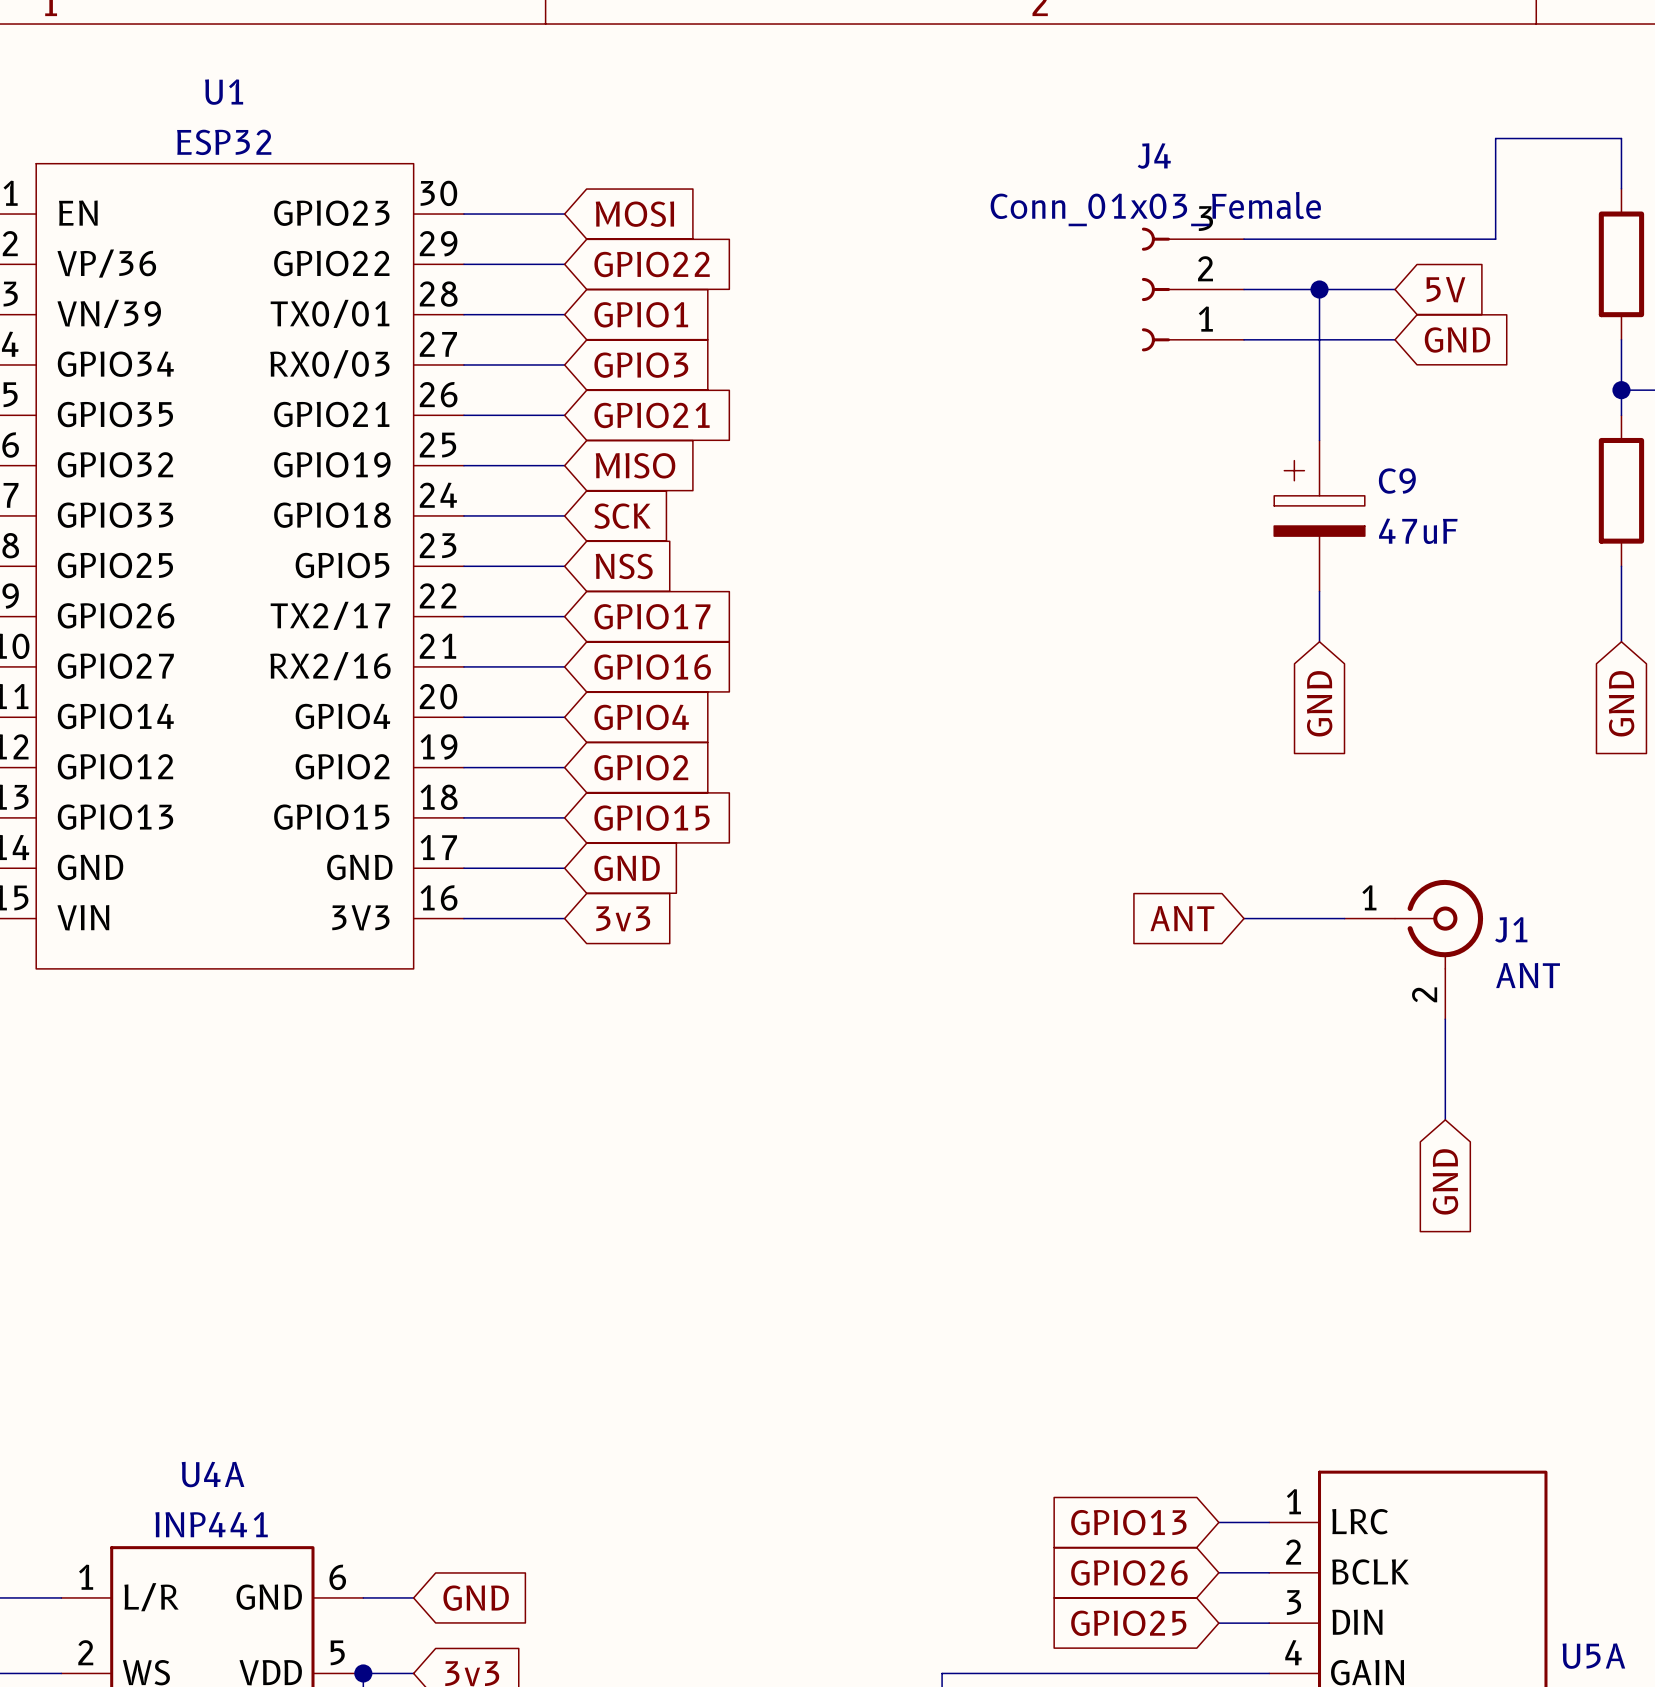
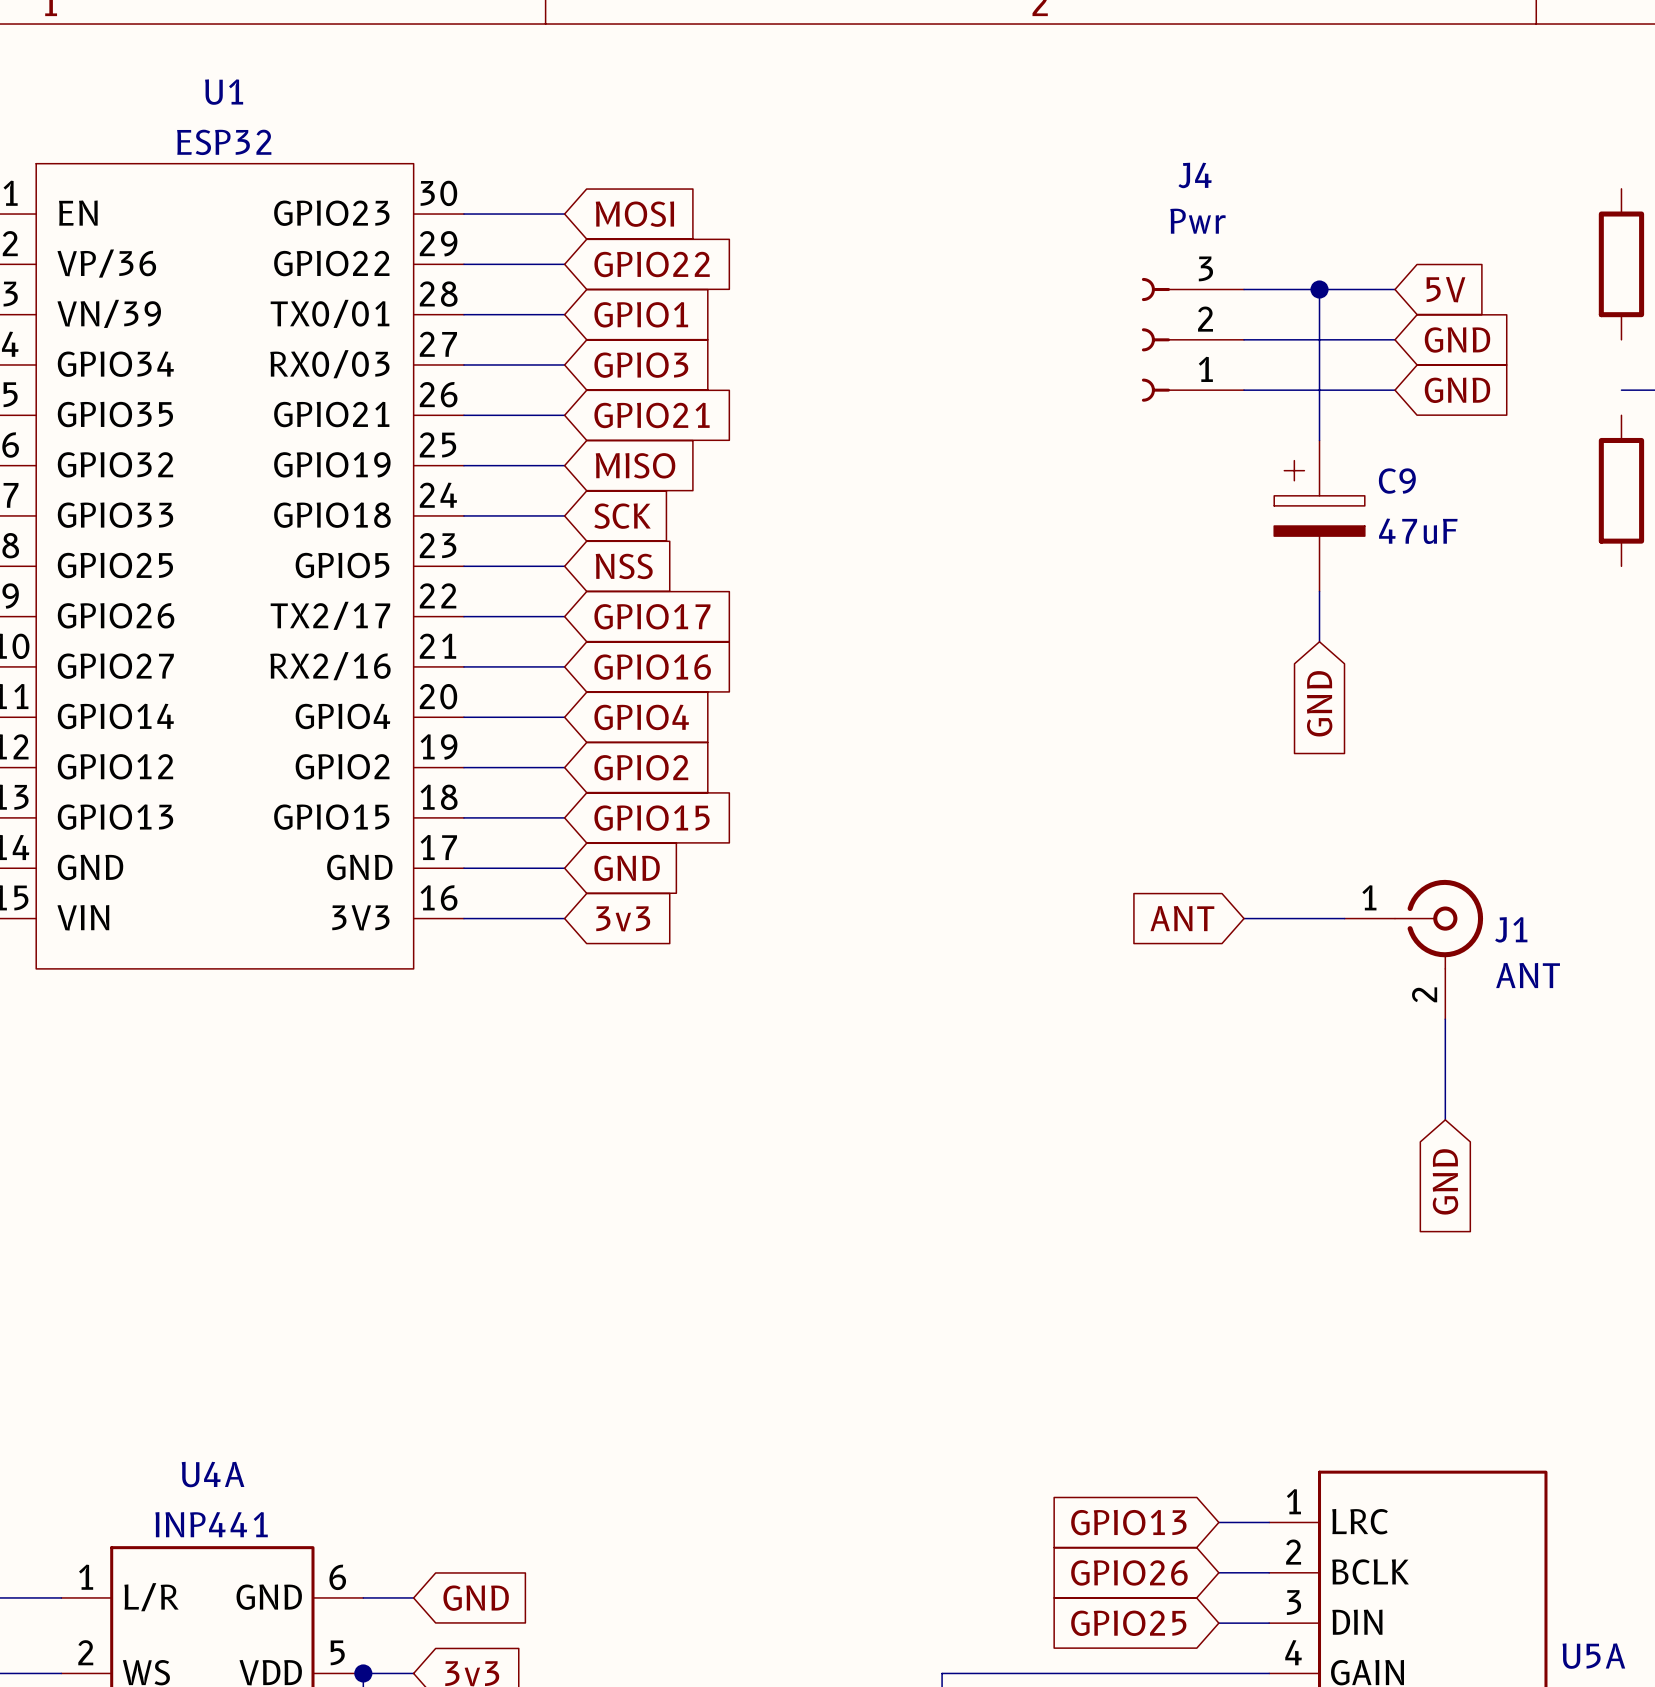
J4 name position: J4 (1154, 156) -> J4 (1195, 175)
wire: (1621, 188) (1621, 138) (1495, 138) (1495, 239) (1244, 239) -> none
J4 value: Conn_01x03_Female (1155, 209) -> Pwr (1198, 221)
J4 position: (1192, 289) -> (1192, 339)
wire: (1621, 339) (1621, 415) -> none
wire: none -> (1244, 390) (1395, 390)
junction: (1621, 390) -> none
wire: (1621, 566) (1621, 641) -> none
global label rotation: 0° (1621, 703) -> 90° counterclockwise (1457, 390)
global label position: GND (1621, 703) -> GND (1457, 390)

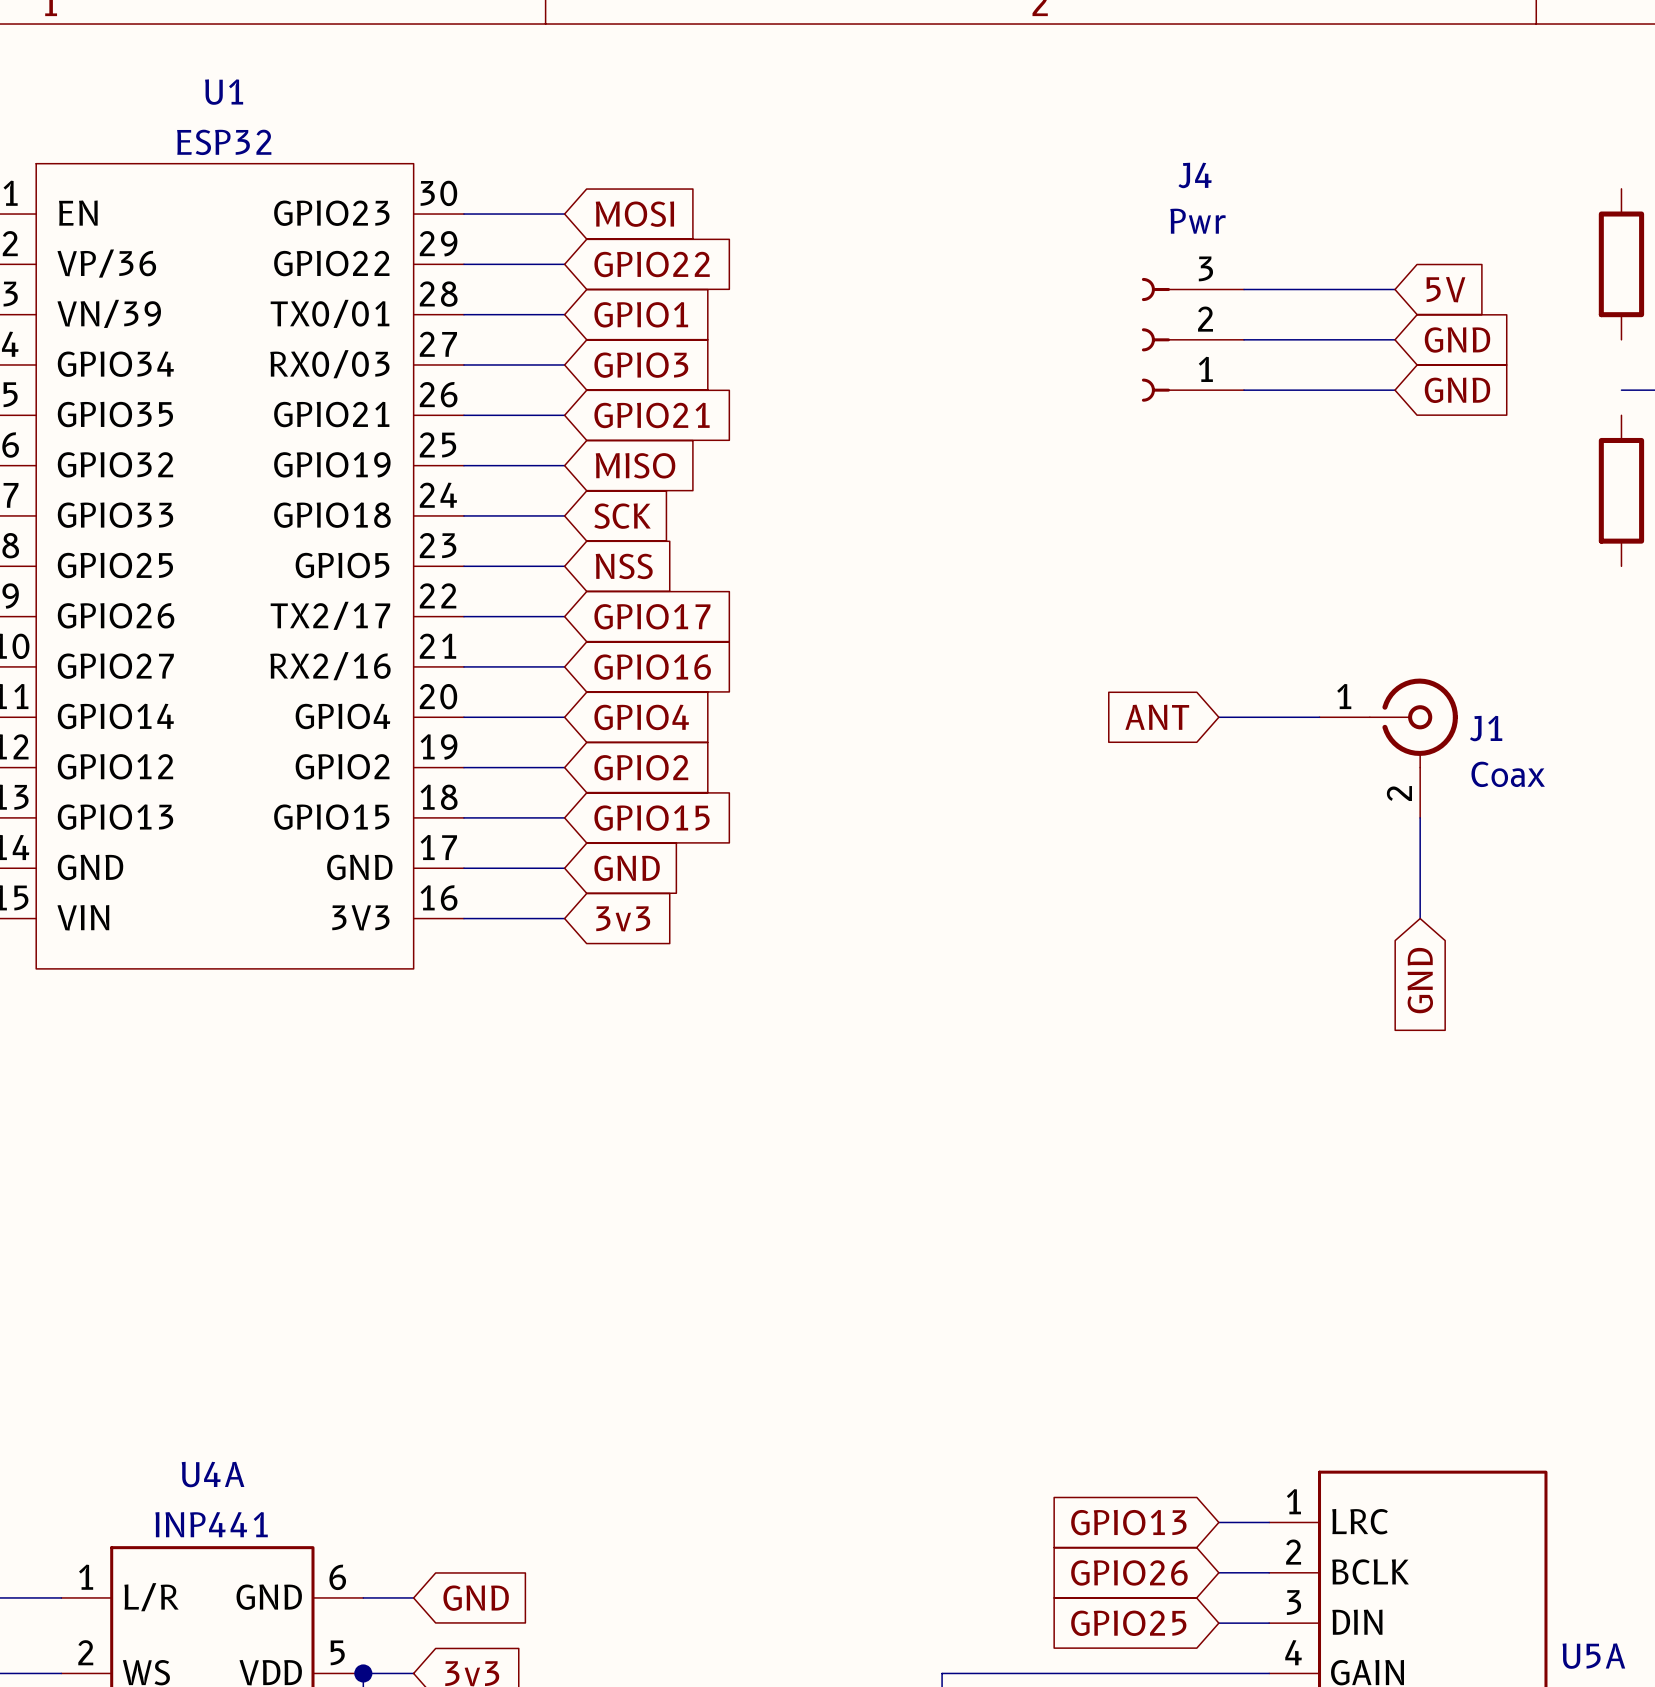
wire: (1319, 289) (1319, 440) -> none
junction: (1319, 289) -> none
C9: 47uF (1319, 515) -> none
wire: (1319, 591) (1319, 641) -> none
global label: GND (1319, 703) -> none
global label position: ANT (1182, 918) -> ANT (1157, 717)
wire: (1244, 918) (1344, 918) -> (1218, 717) (1319, 717)
J1 position: (1413, 949) -> (1388, 748)
J1 value: ANT (1528, 975) -> Coax (1508, 774)
global label: none -> GND (1420, 980)
wire: (1445, 1019) (1445, 1119) -> (1420, 817) (1420, 918)
global label: GND (1445, 1181) -> none

